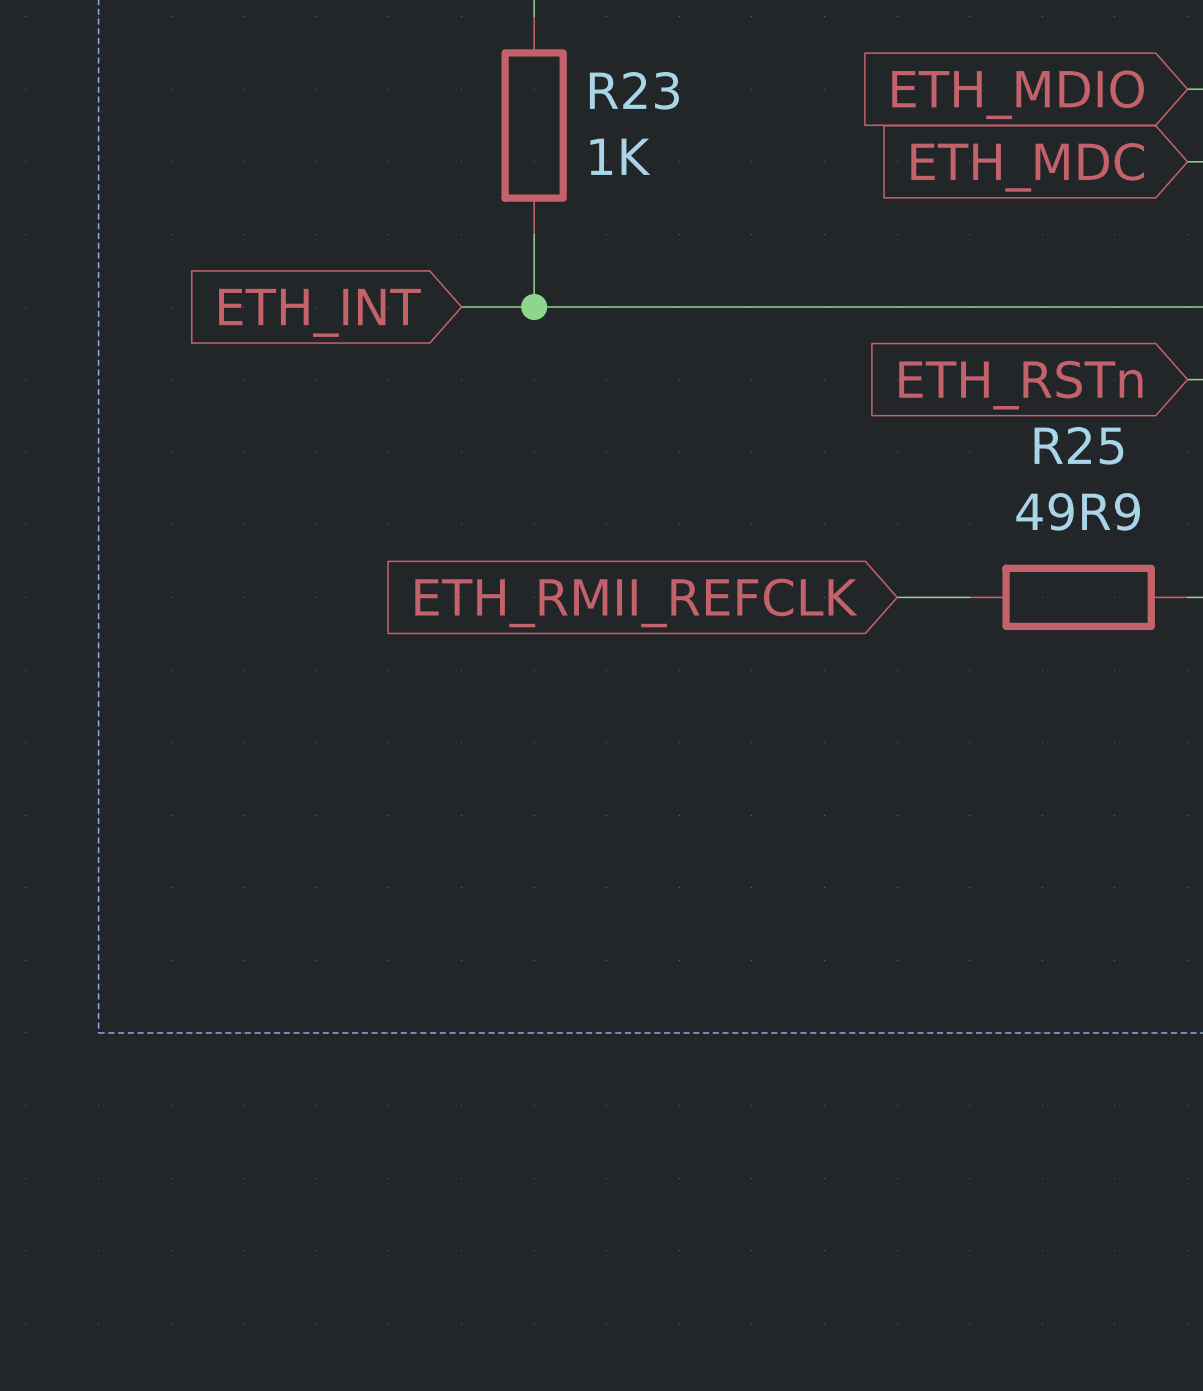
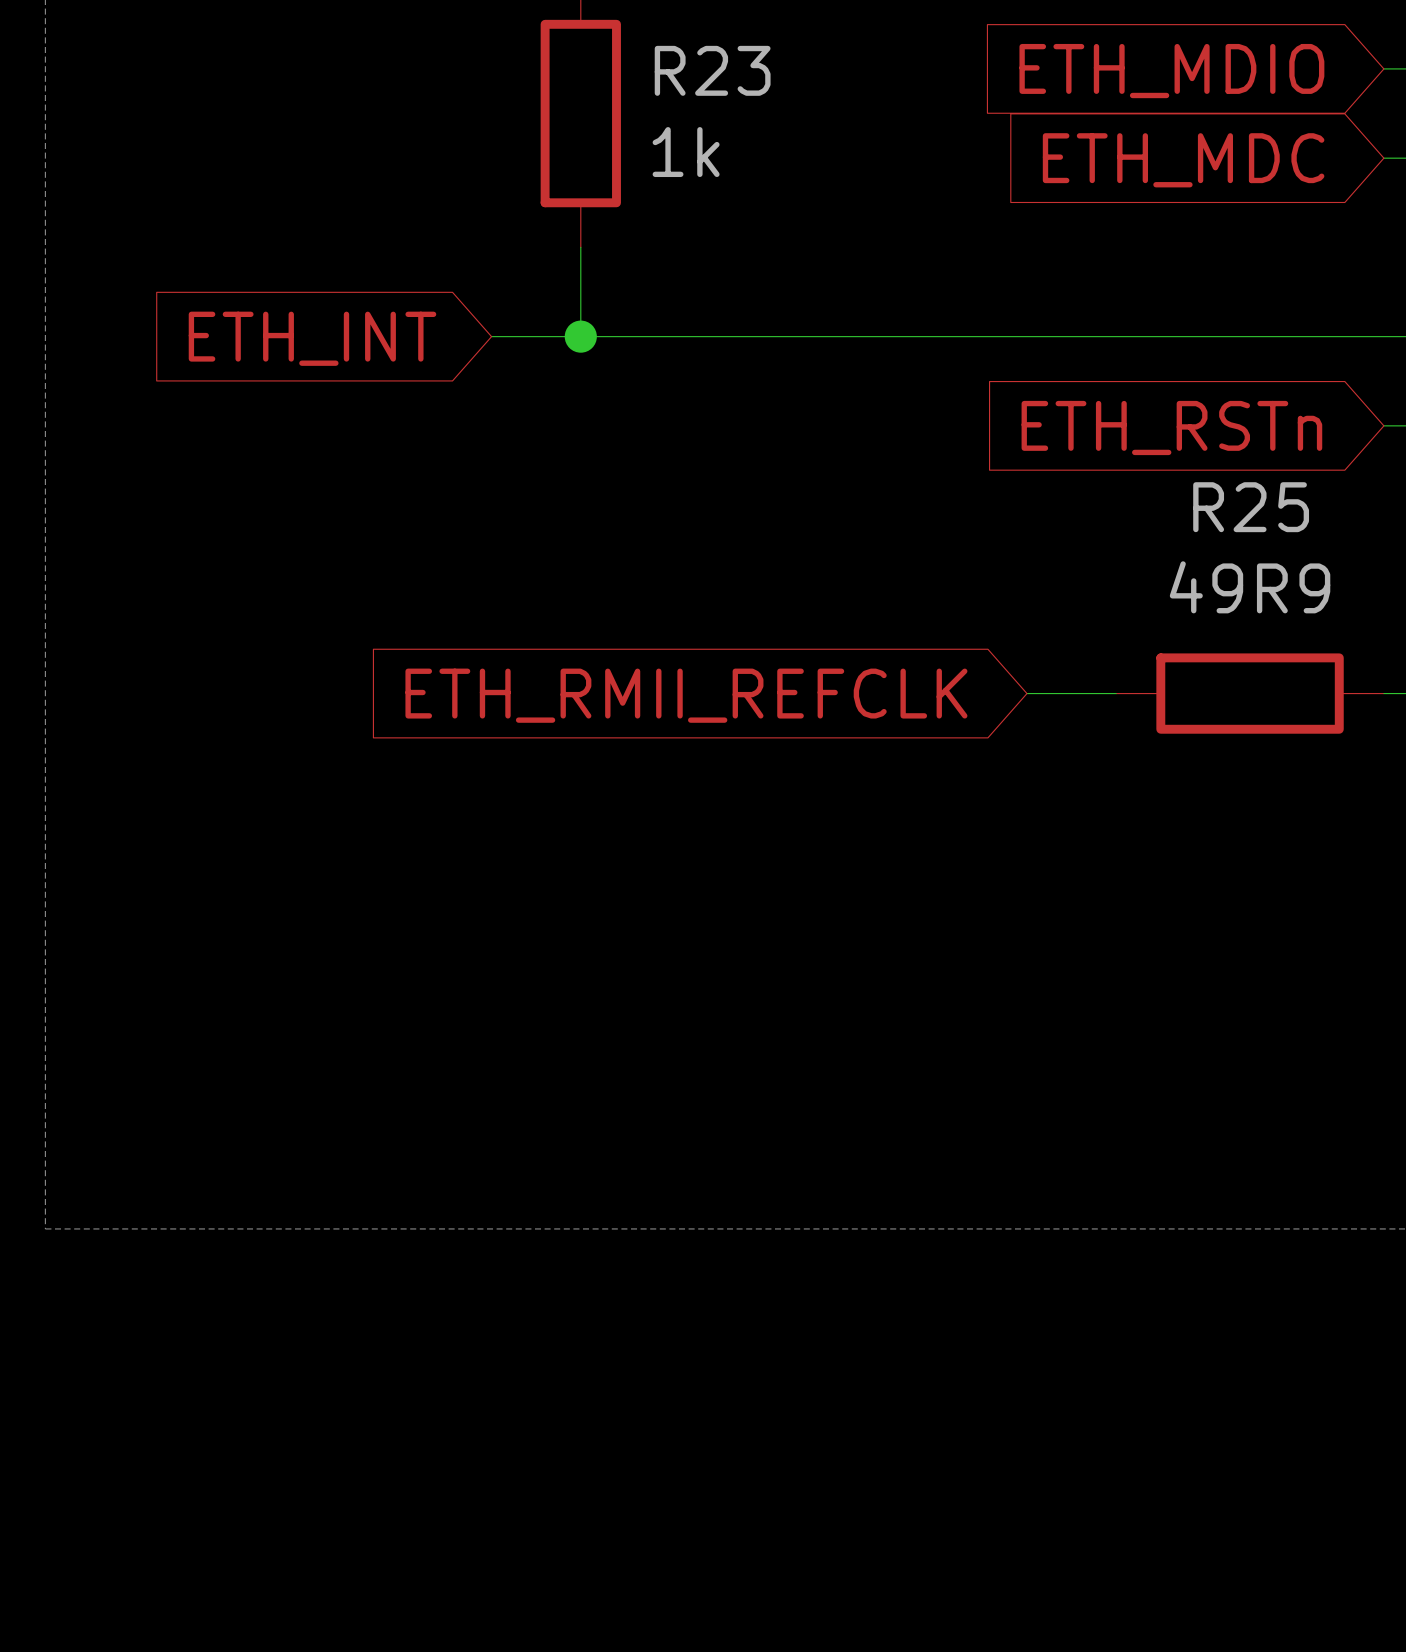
R23 value: 1K (620, 156) -> 1k (686, 152)

